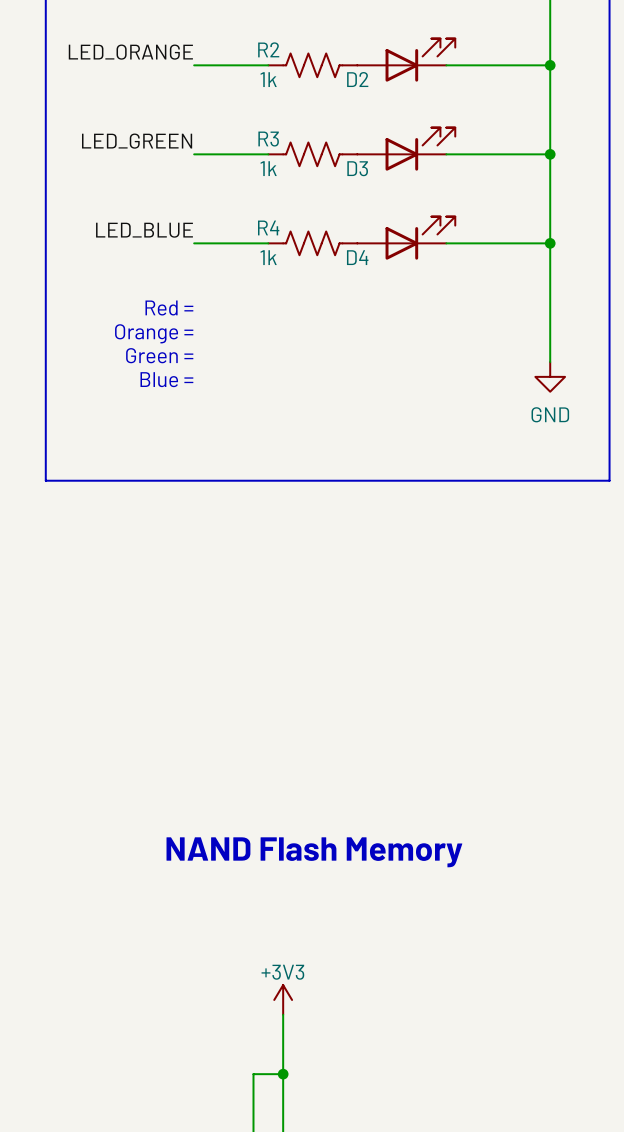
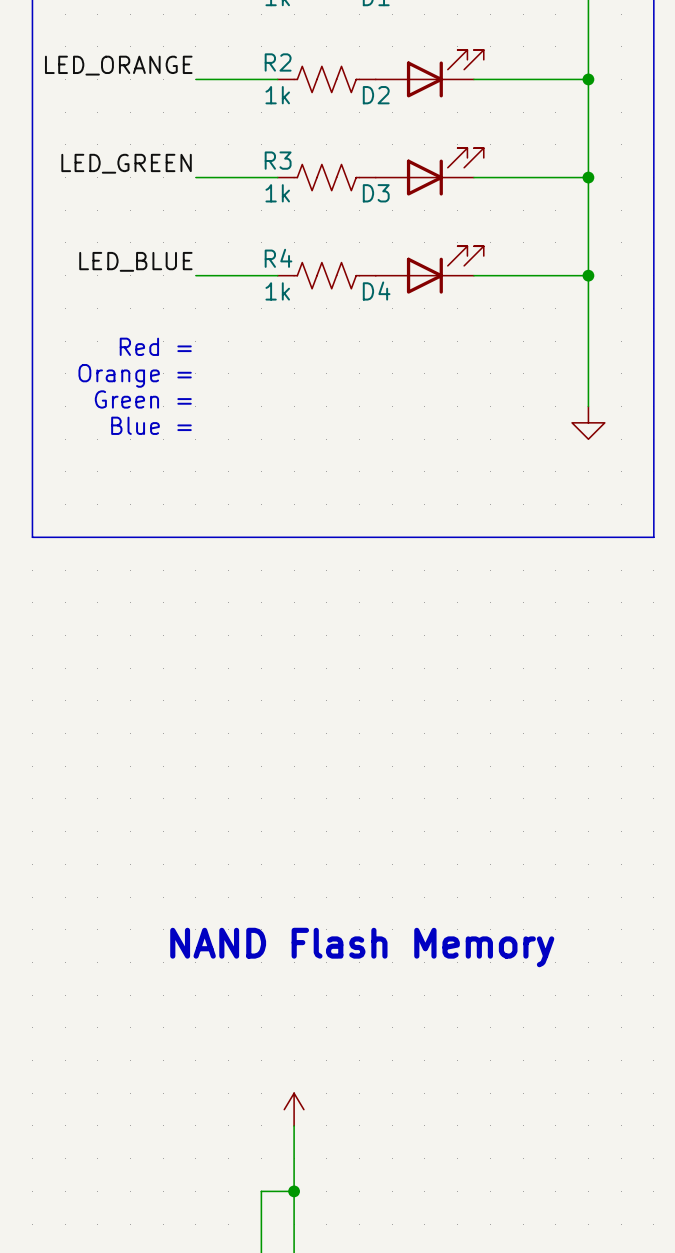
power symbol text: GND (550, 414) -> none
power symbol text: +3V3 (282, 972) -> none

